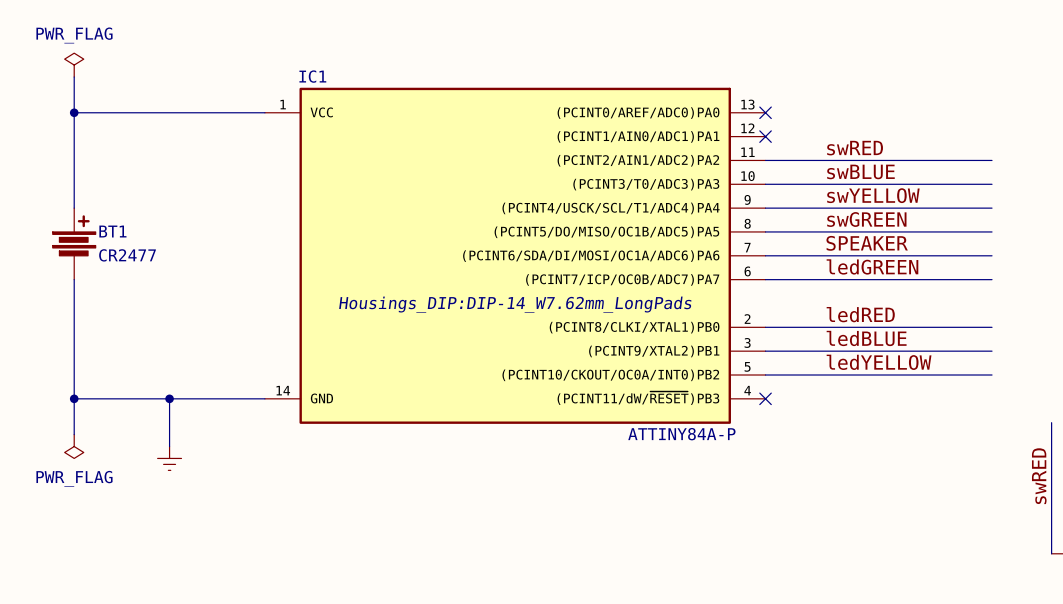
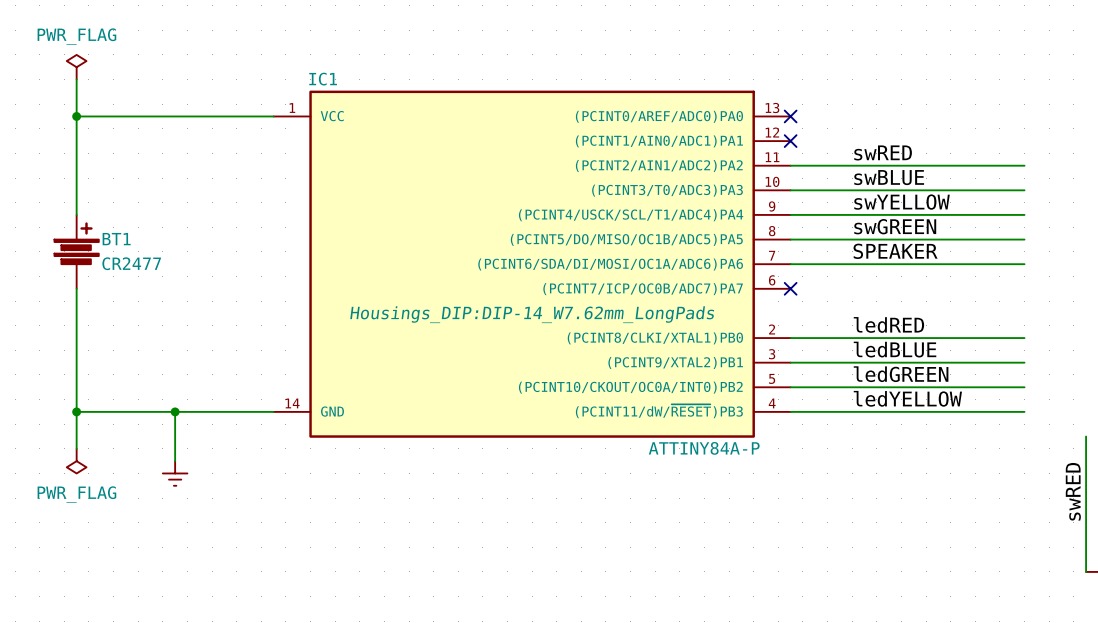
label: ledGREEN (872, 266) -> none
wire: (765, 279) (992, 279) -> (790, 411) (1024, 411)
no-connect mark: none -> (790, 288)
label: ledYELLOW (879, 362) -> ledGREEN (901, 374)
label: none -> ledYELLOW (907, 398)
no-connect mark: (765, 398) -> none

